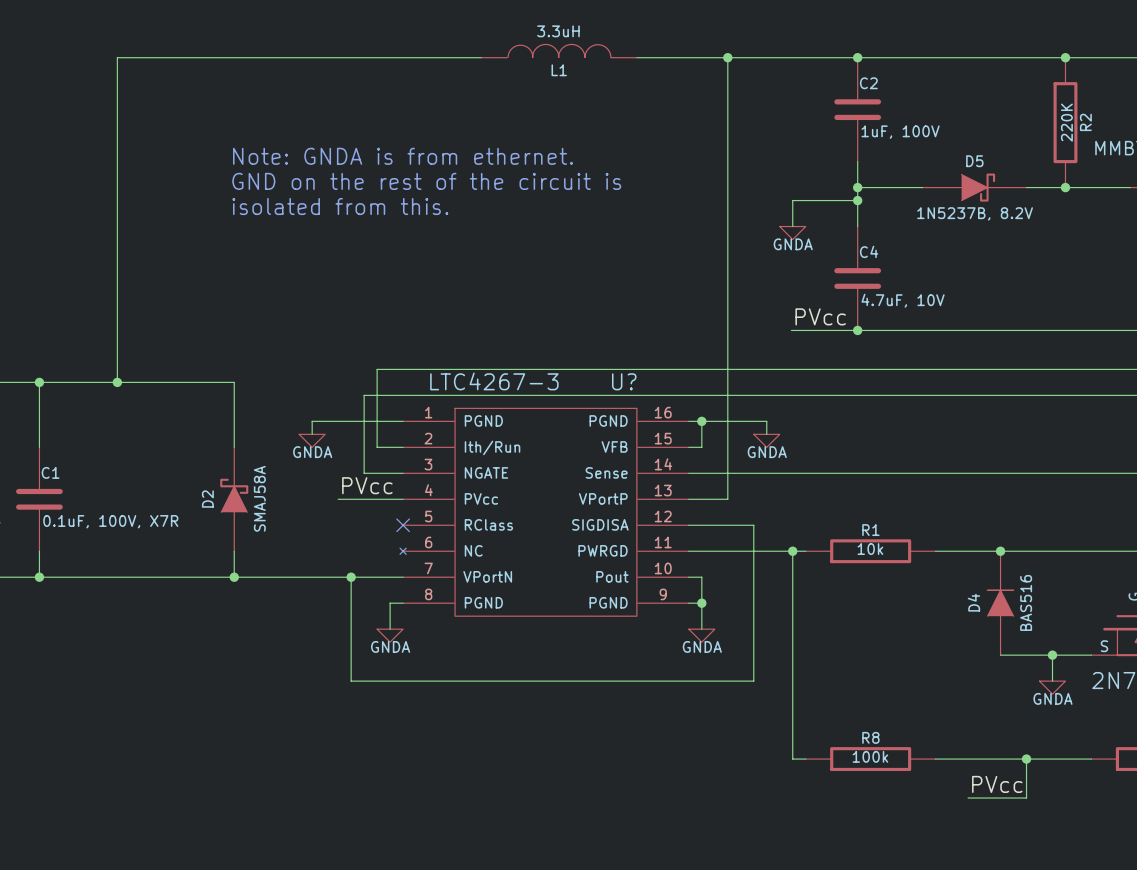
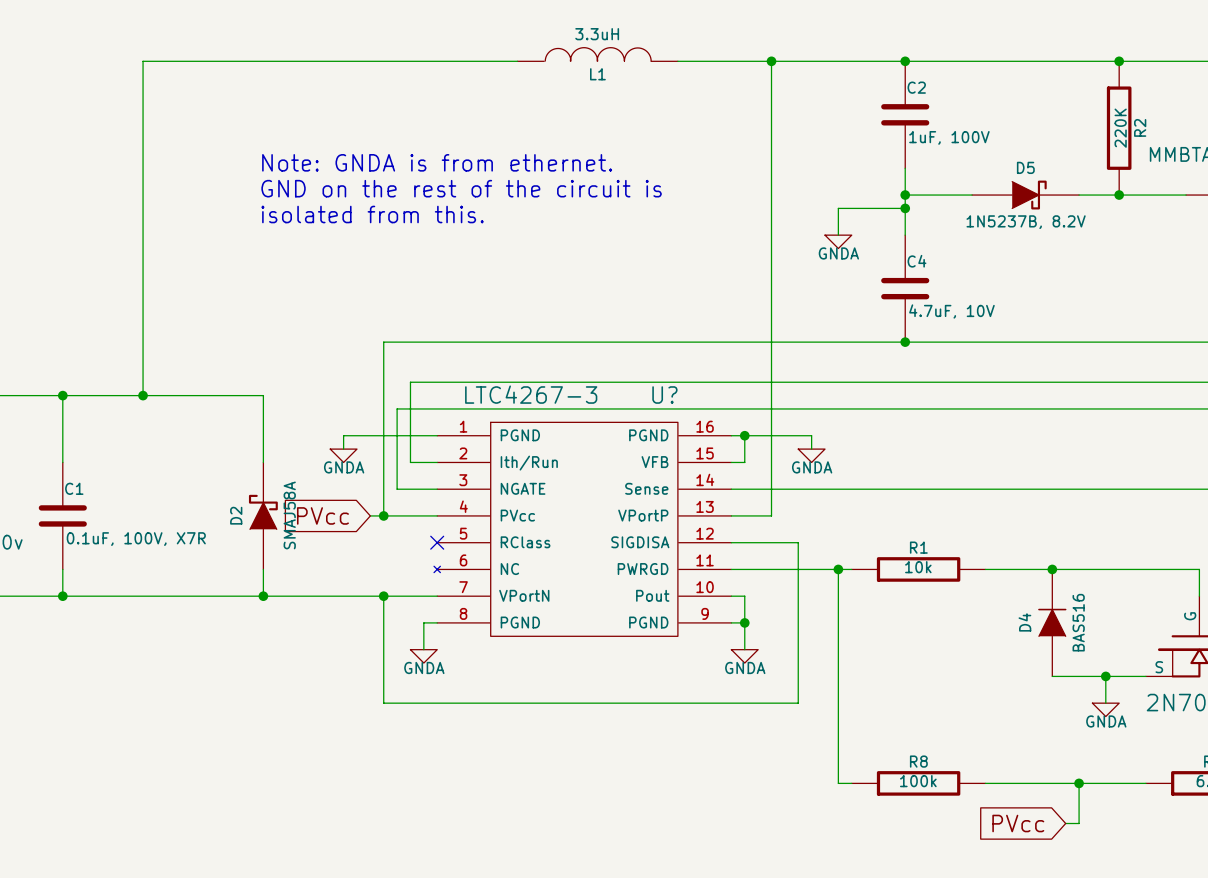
label: PVcc (820, 316) -> none
wire: none -> (837, 342) (383, 342) (383, 515)
label: PVcc (367, 485) -> none
global label: none -> PVcc (322, 515)
junction: none -> (383, 515)
label: PVcc (997, 784) -> none
global label: none -> PVcc (1018, 823)
wire: (968, 798) (1013, 798) -> none

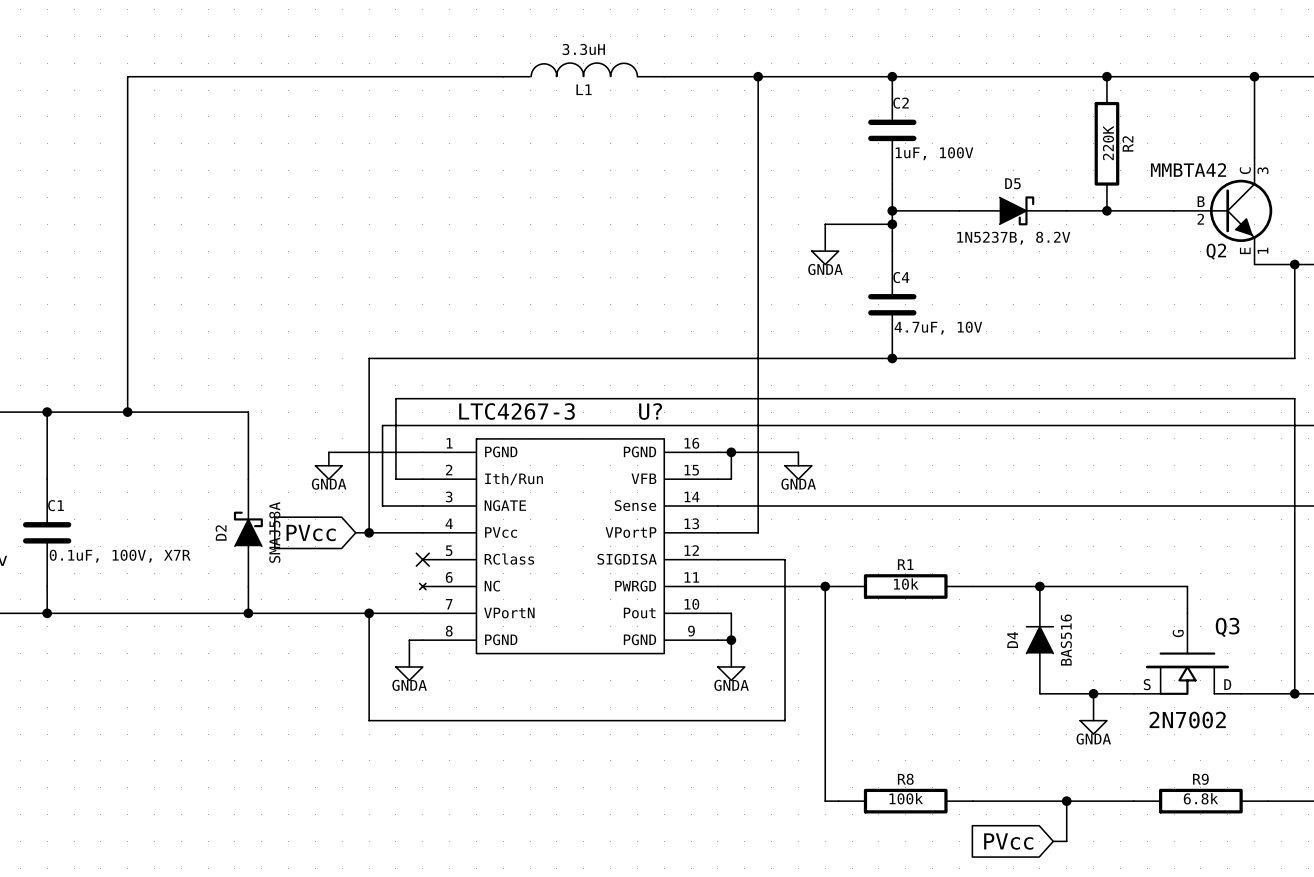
text: Note: GNDA is from ethernet. (437, 162) -> none
text: GND on the rest of the circuit is (461, 188) -> none
text: isolated from this. (372, 214) -> none

